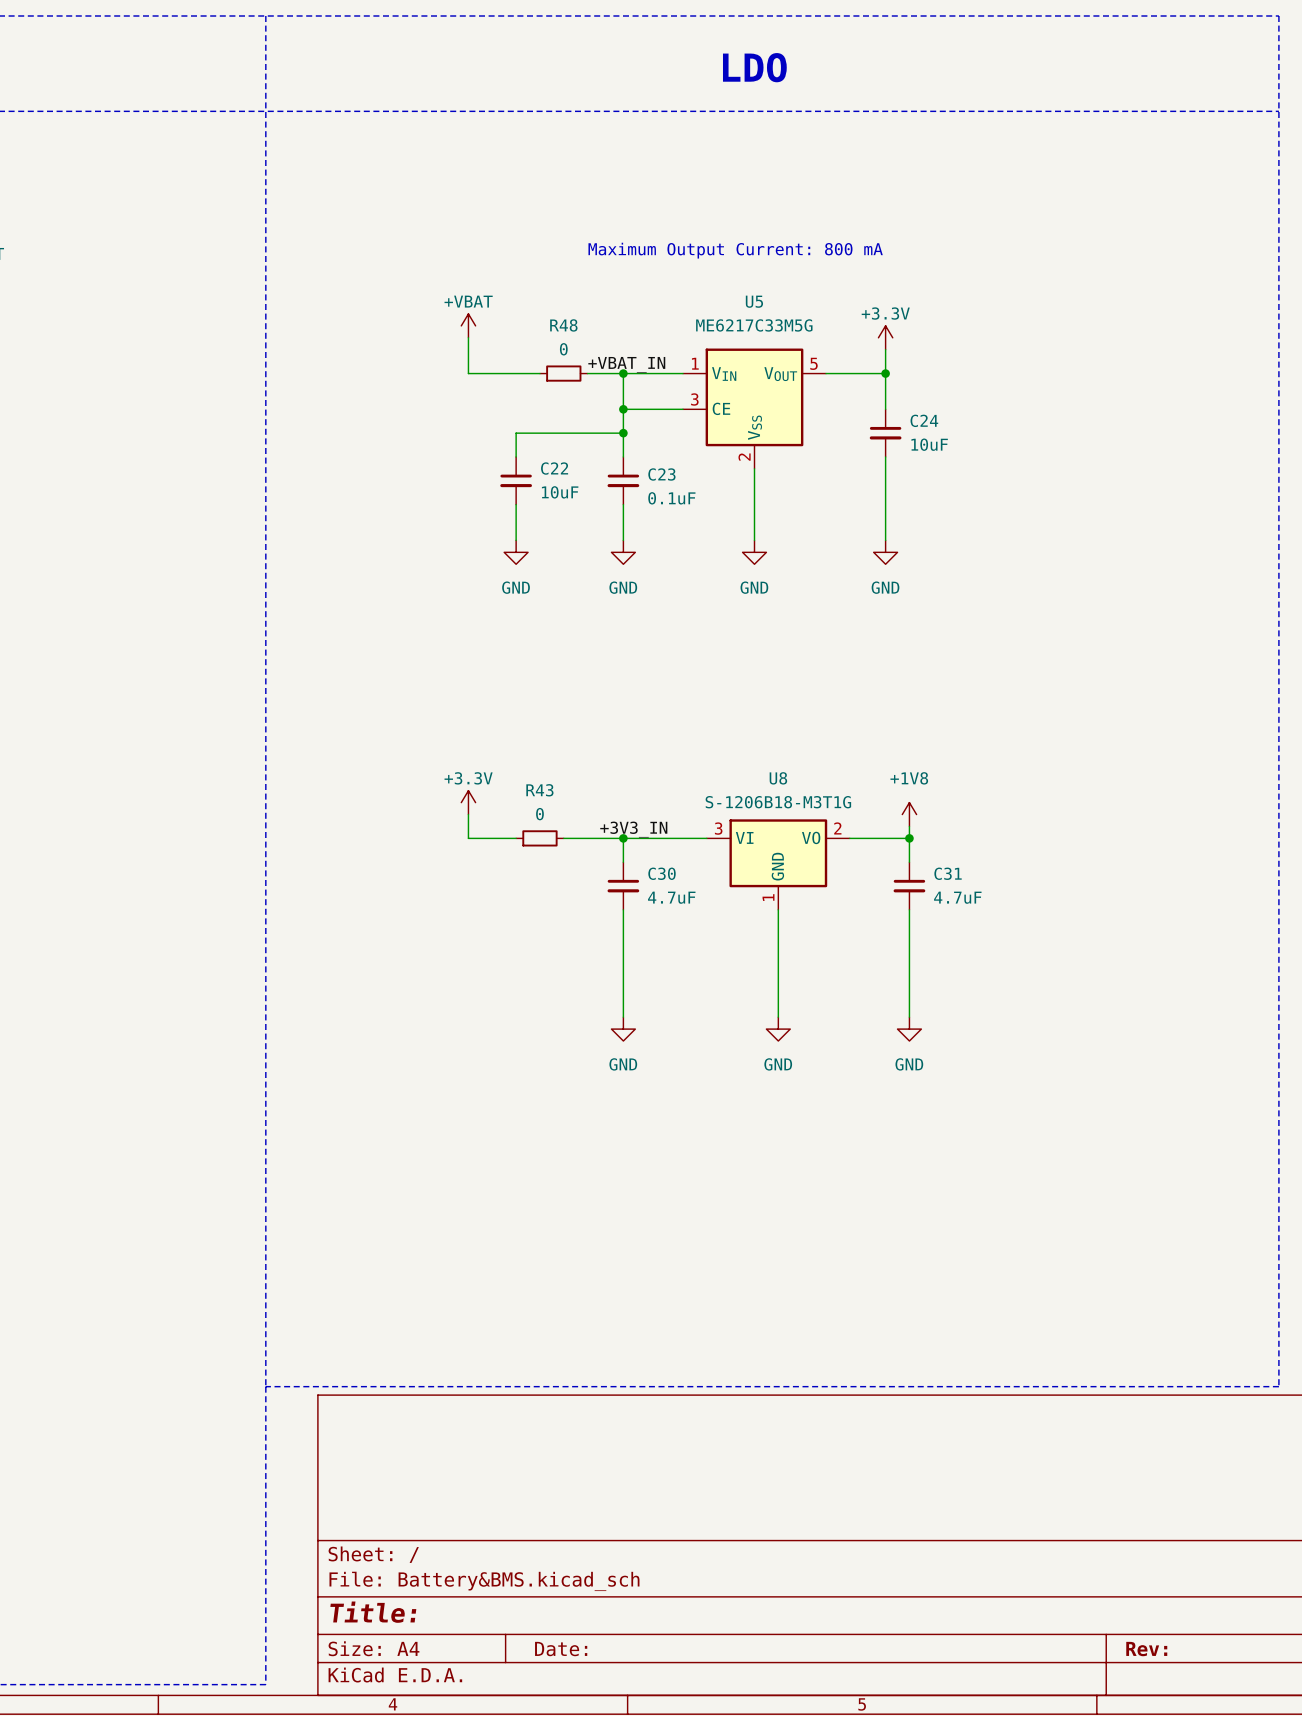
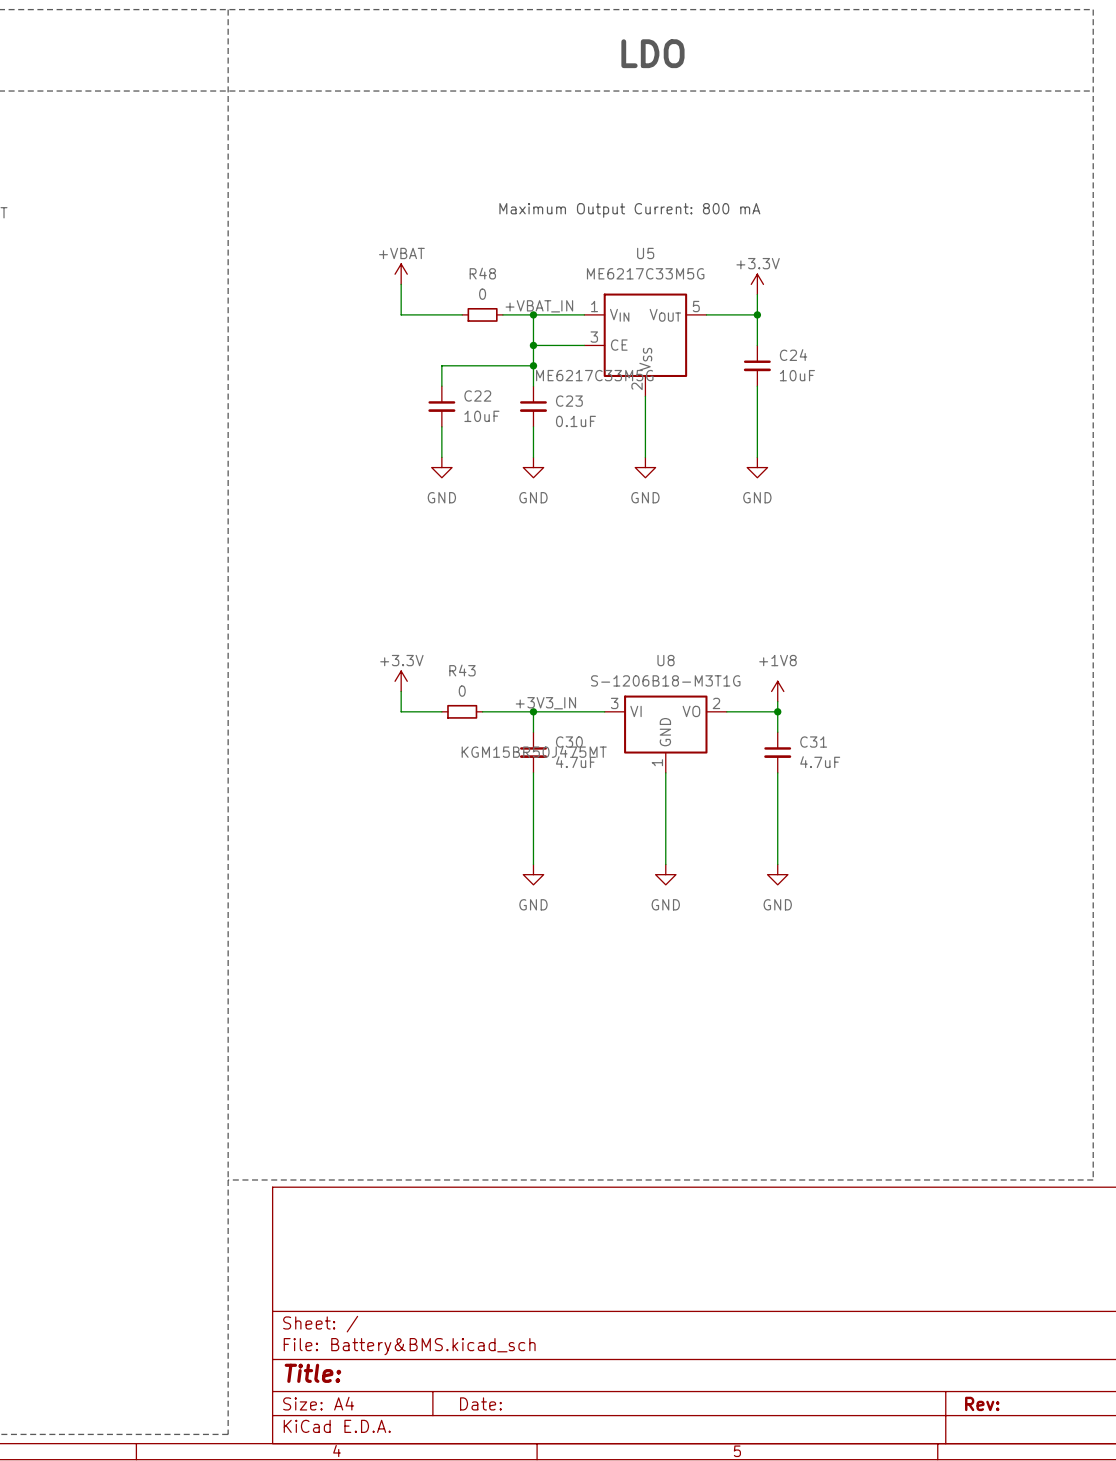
U5 text: none -> ME6217C33M5G (594, 375)
C30 text: none -> KGM15BR50J475MT (534, 751)

